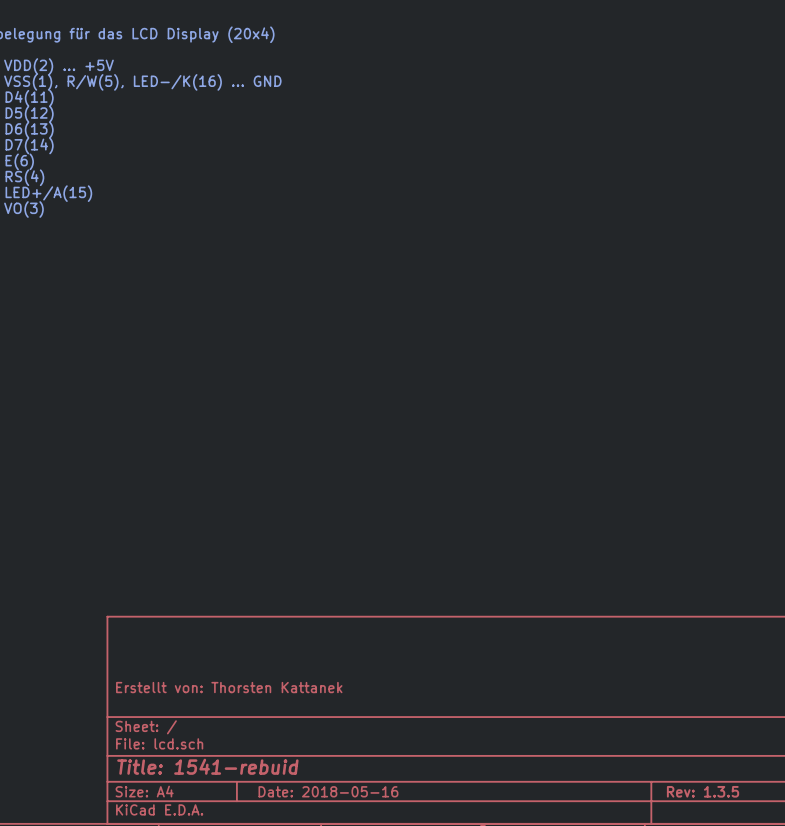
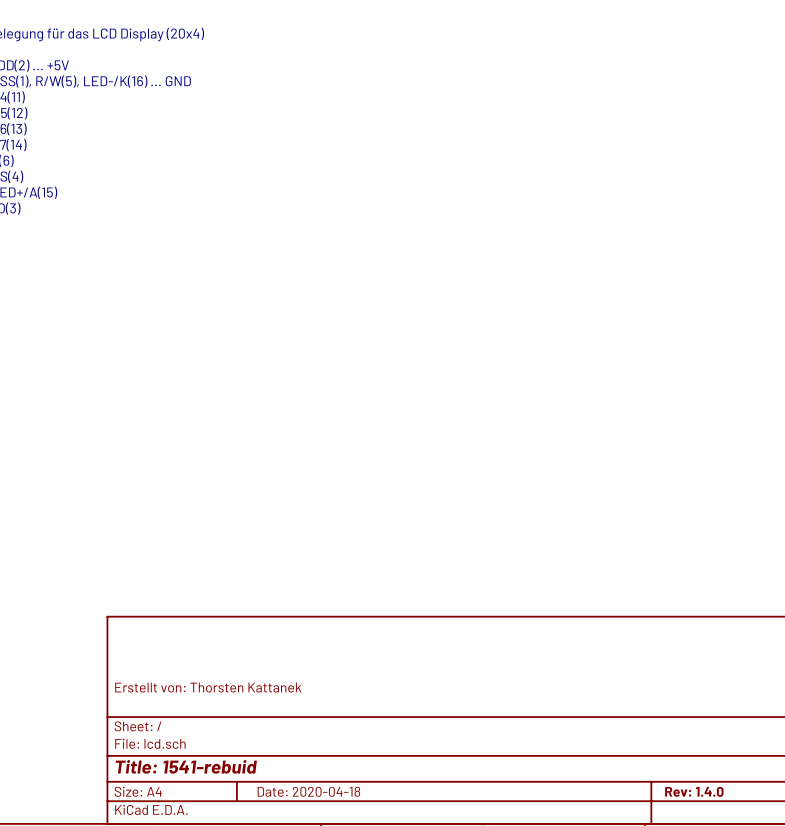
title block: Date: 2018-05-16 (328, 791) -> Date: 2020-04-18 (308, 791)
title block: Rev: 1.3.5 (703, 791) -> Rev: 1.4.0 (694, 791)

